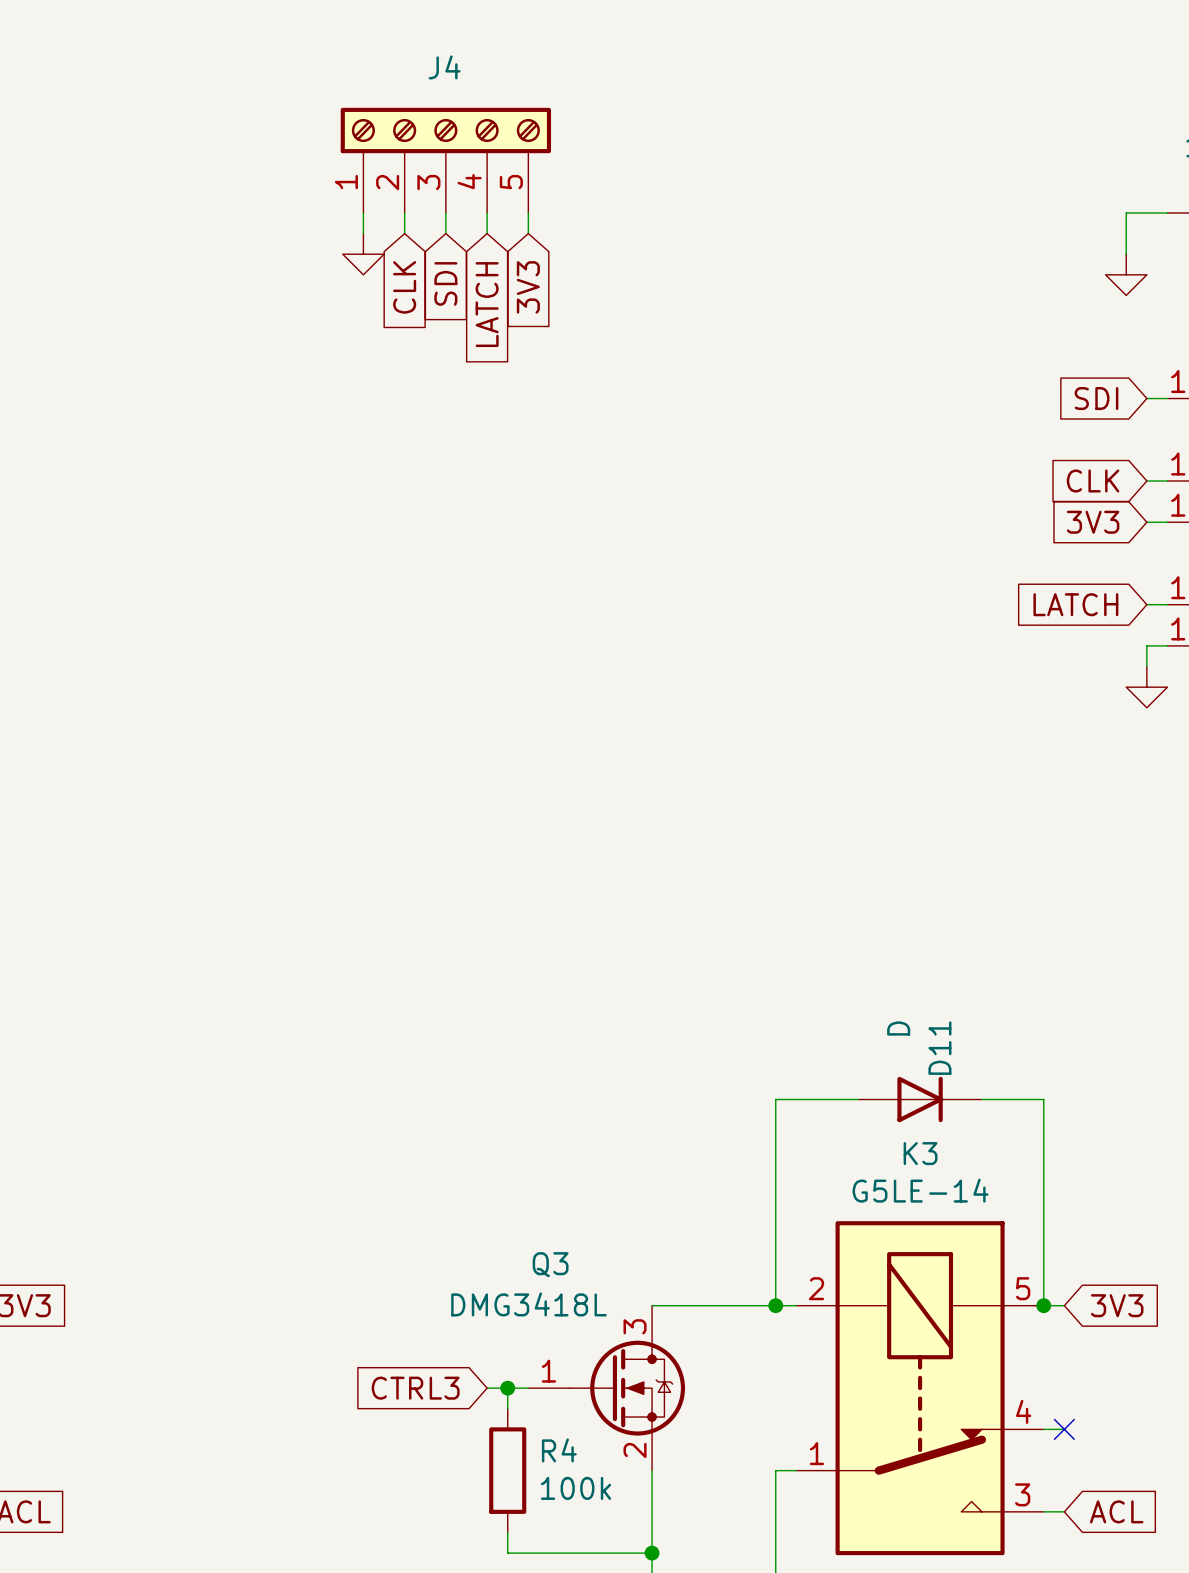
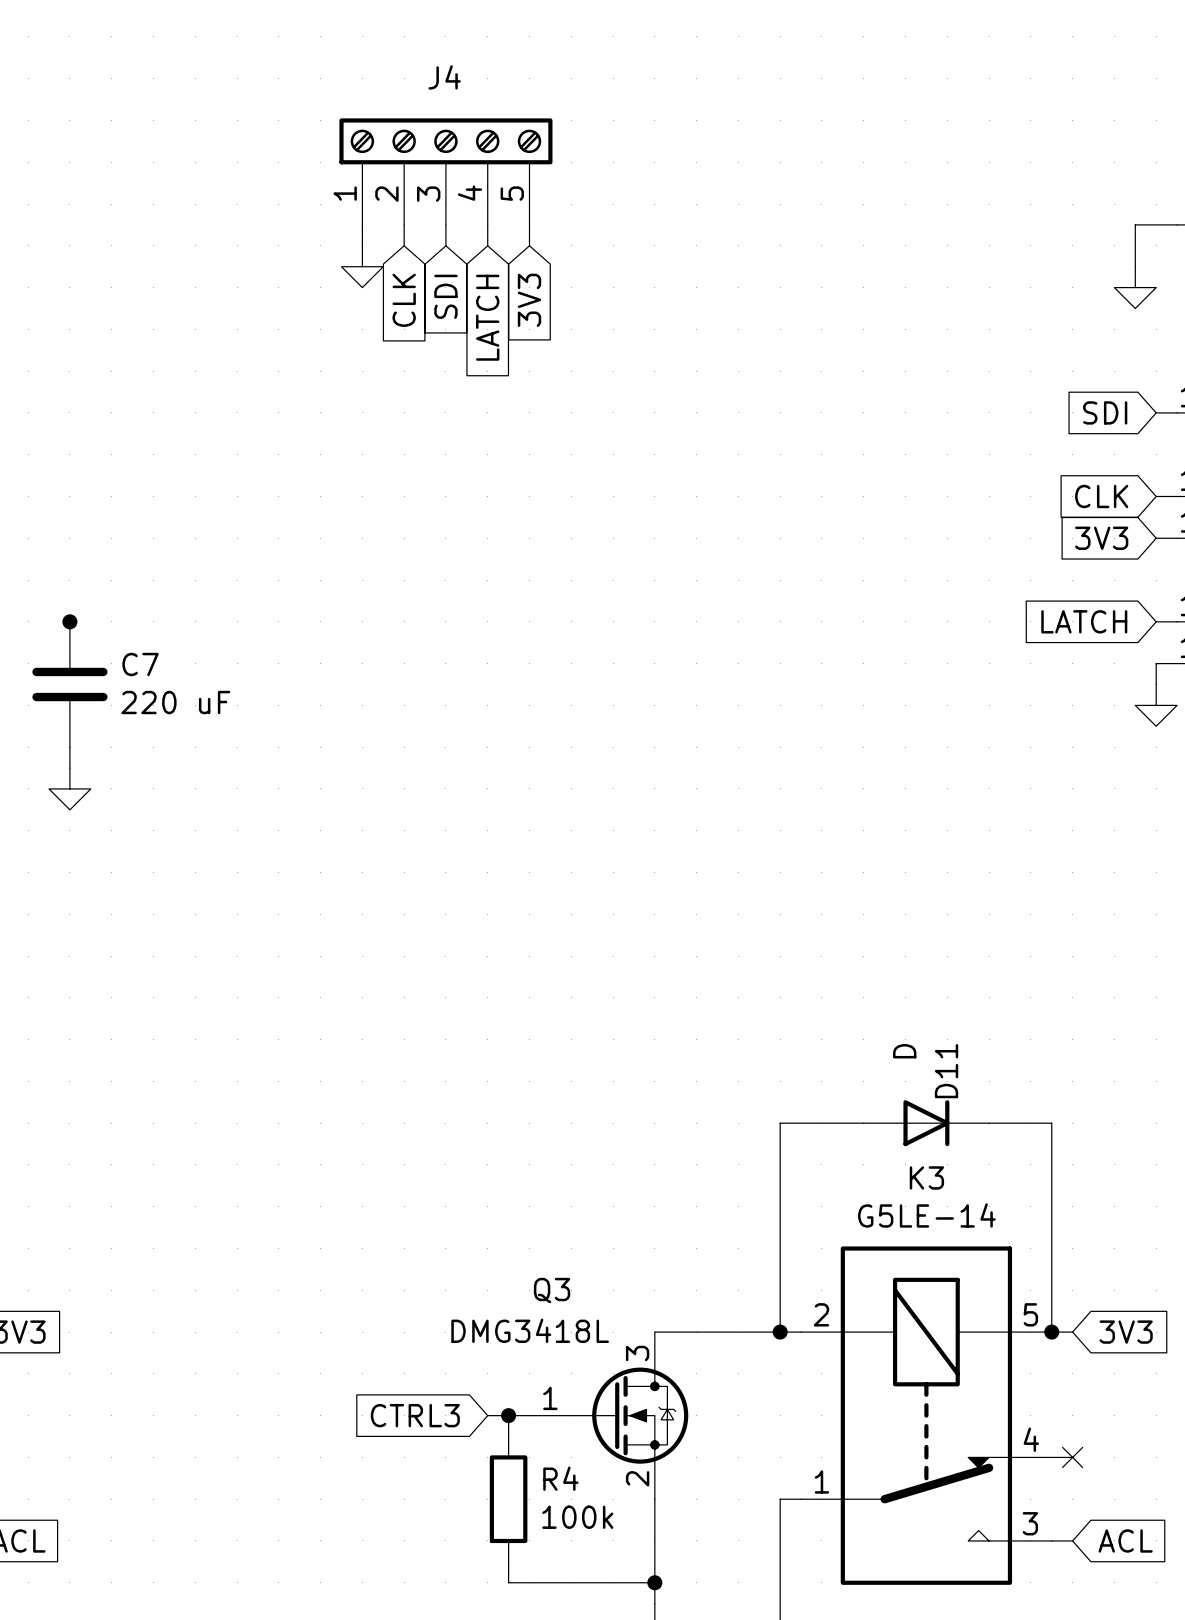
junction: none -> (69, 621)
C7: none -> 220 uF (69, 684)
wire: none -> (69, 747) (69, 768)
power symbol: none -> (69, 788)

